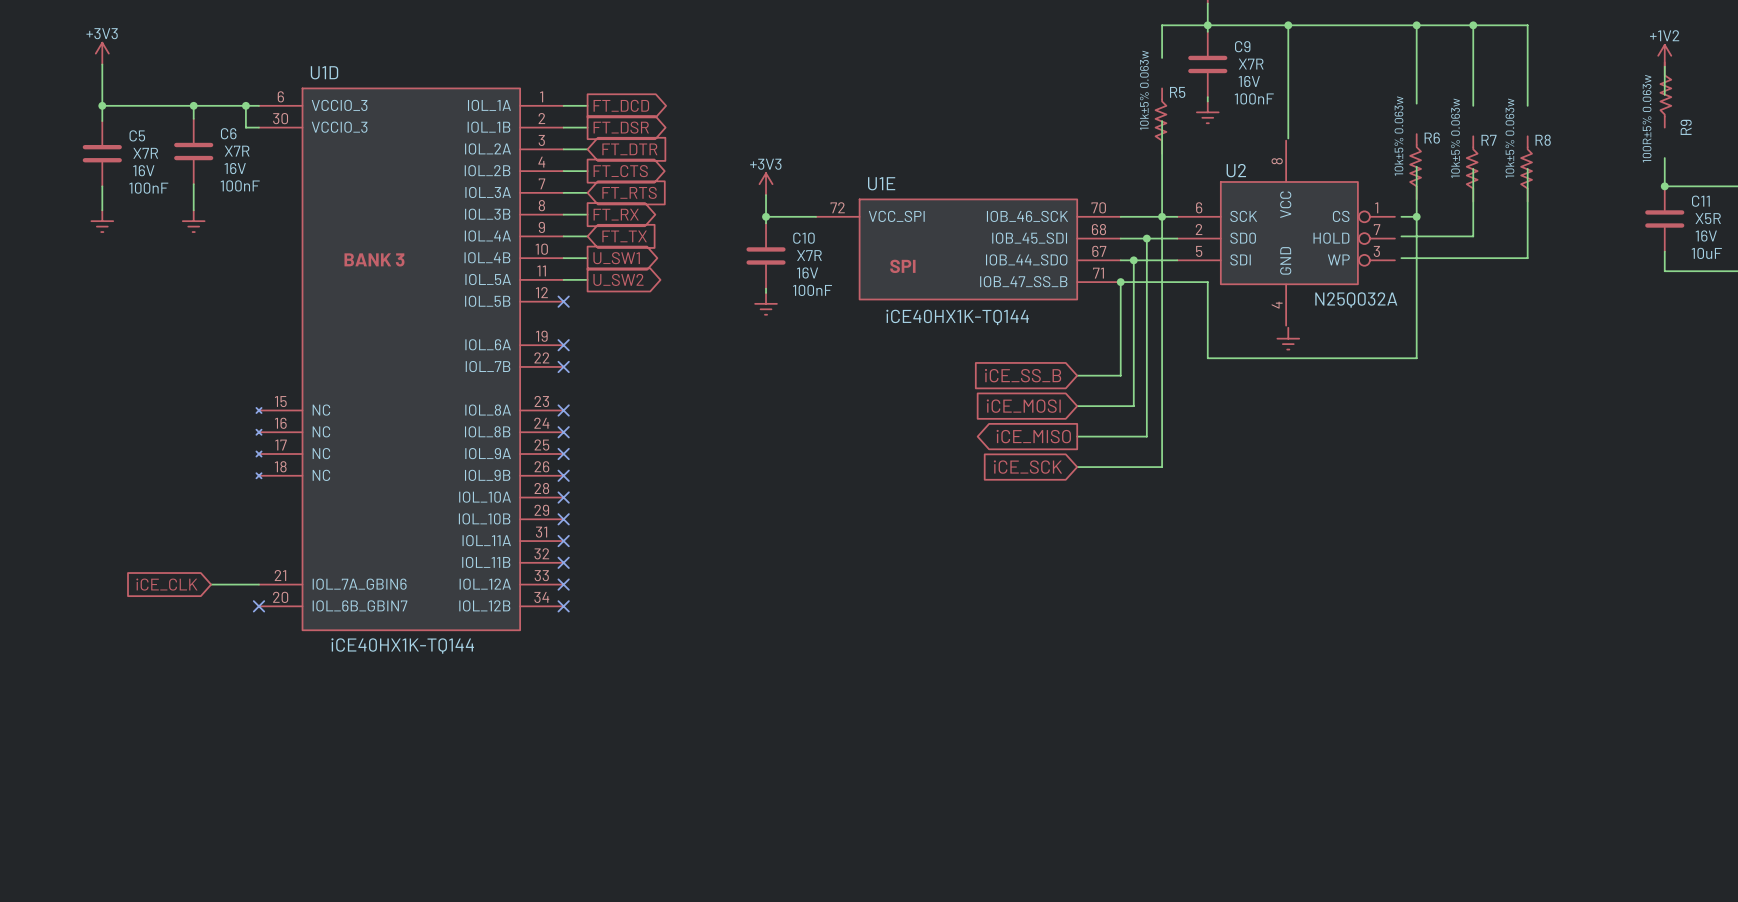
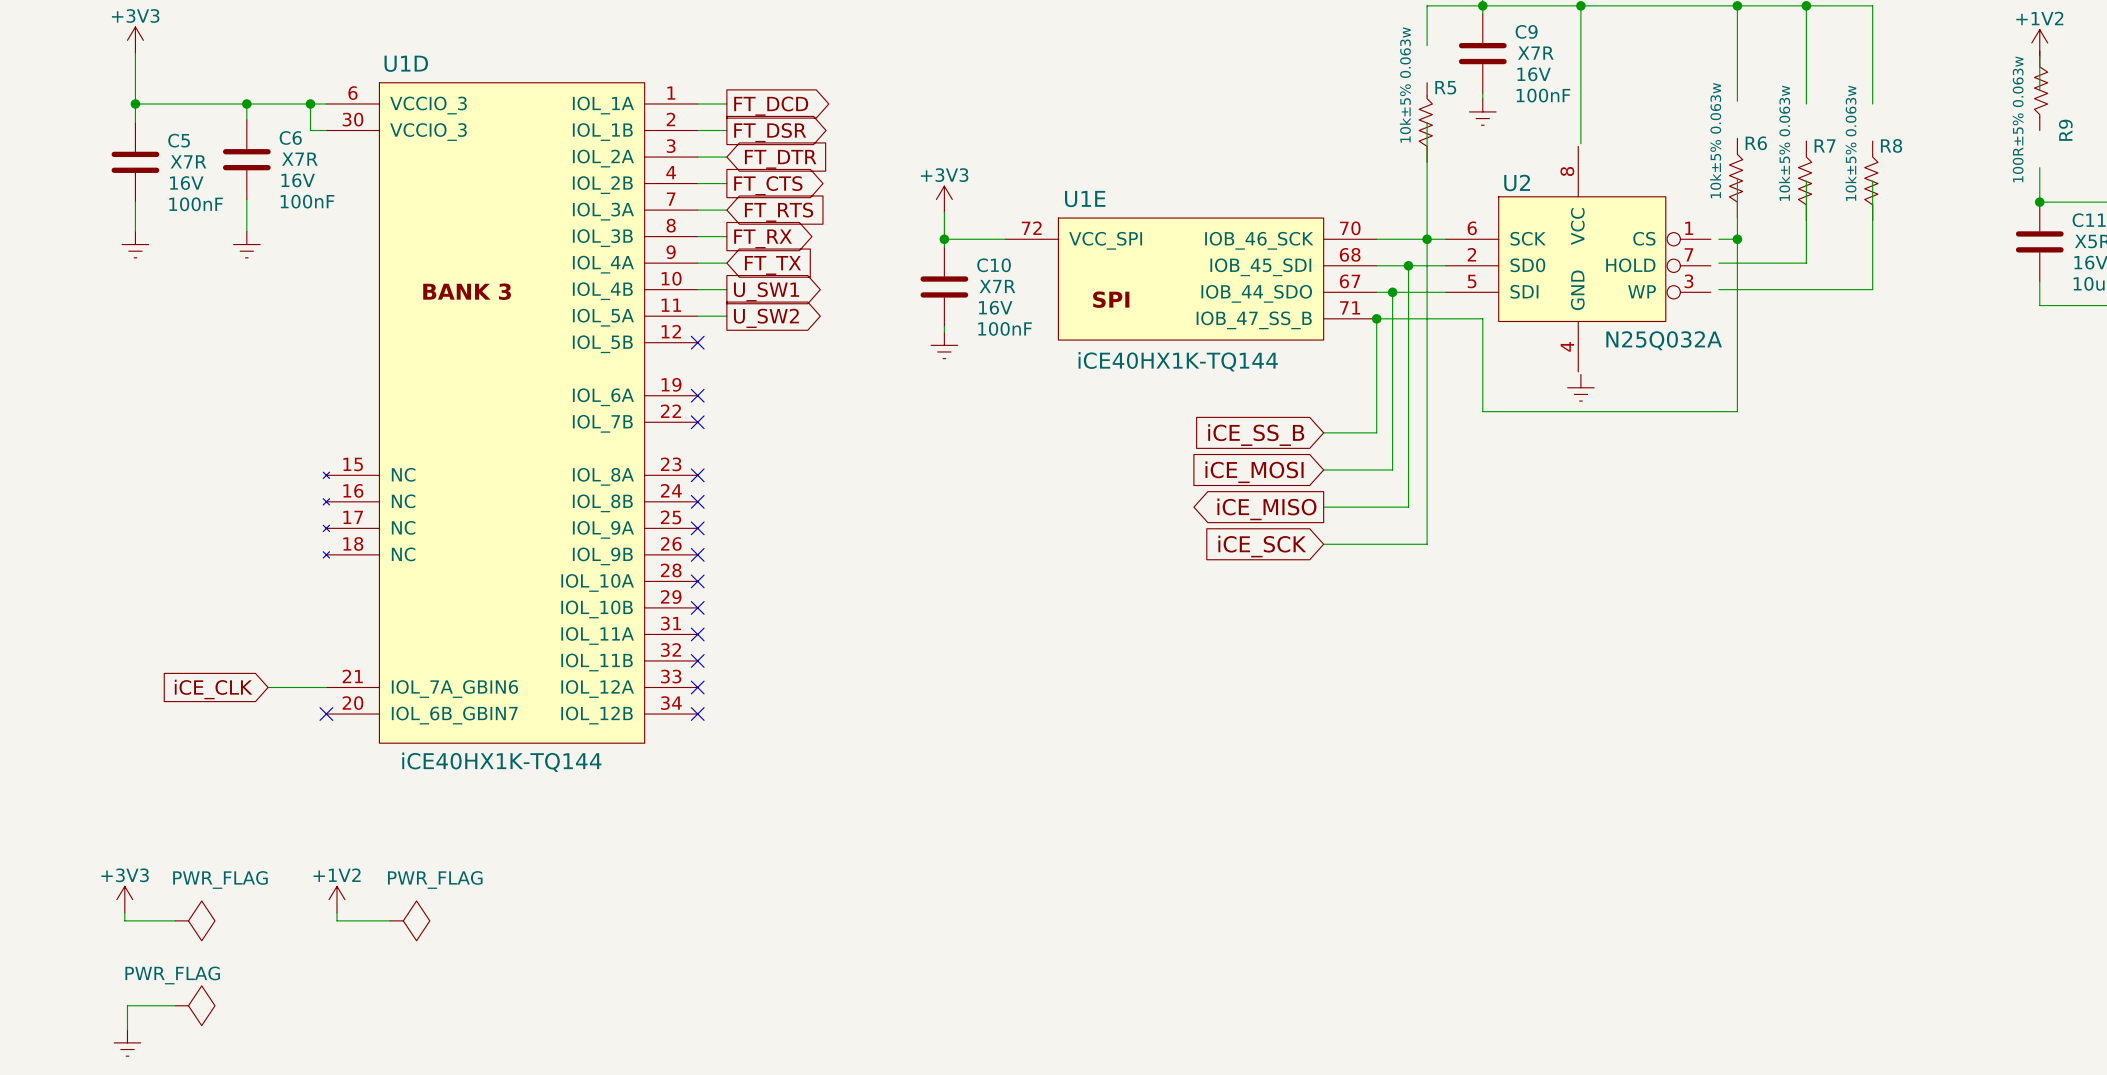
power symbol: none -> +3V3 (124, 899)
power symbol: none -> +1V2 (337, 899)
wire: none -> (124, 912) (124, 920) (175, 920)
wire: none -> (337, 912) (337, 920) (390, 920)
power symbol: none -> PWR_FLAG (195, 920)
power symbol: none -> PWR_FLAG (409, 920)
wire: none -> (175, 1005) (127, 1005) (127, 1029)
power symbol: none -> PWR_FLAG (195, 1005)
power symbol: none -> (127, 1042)

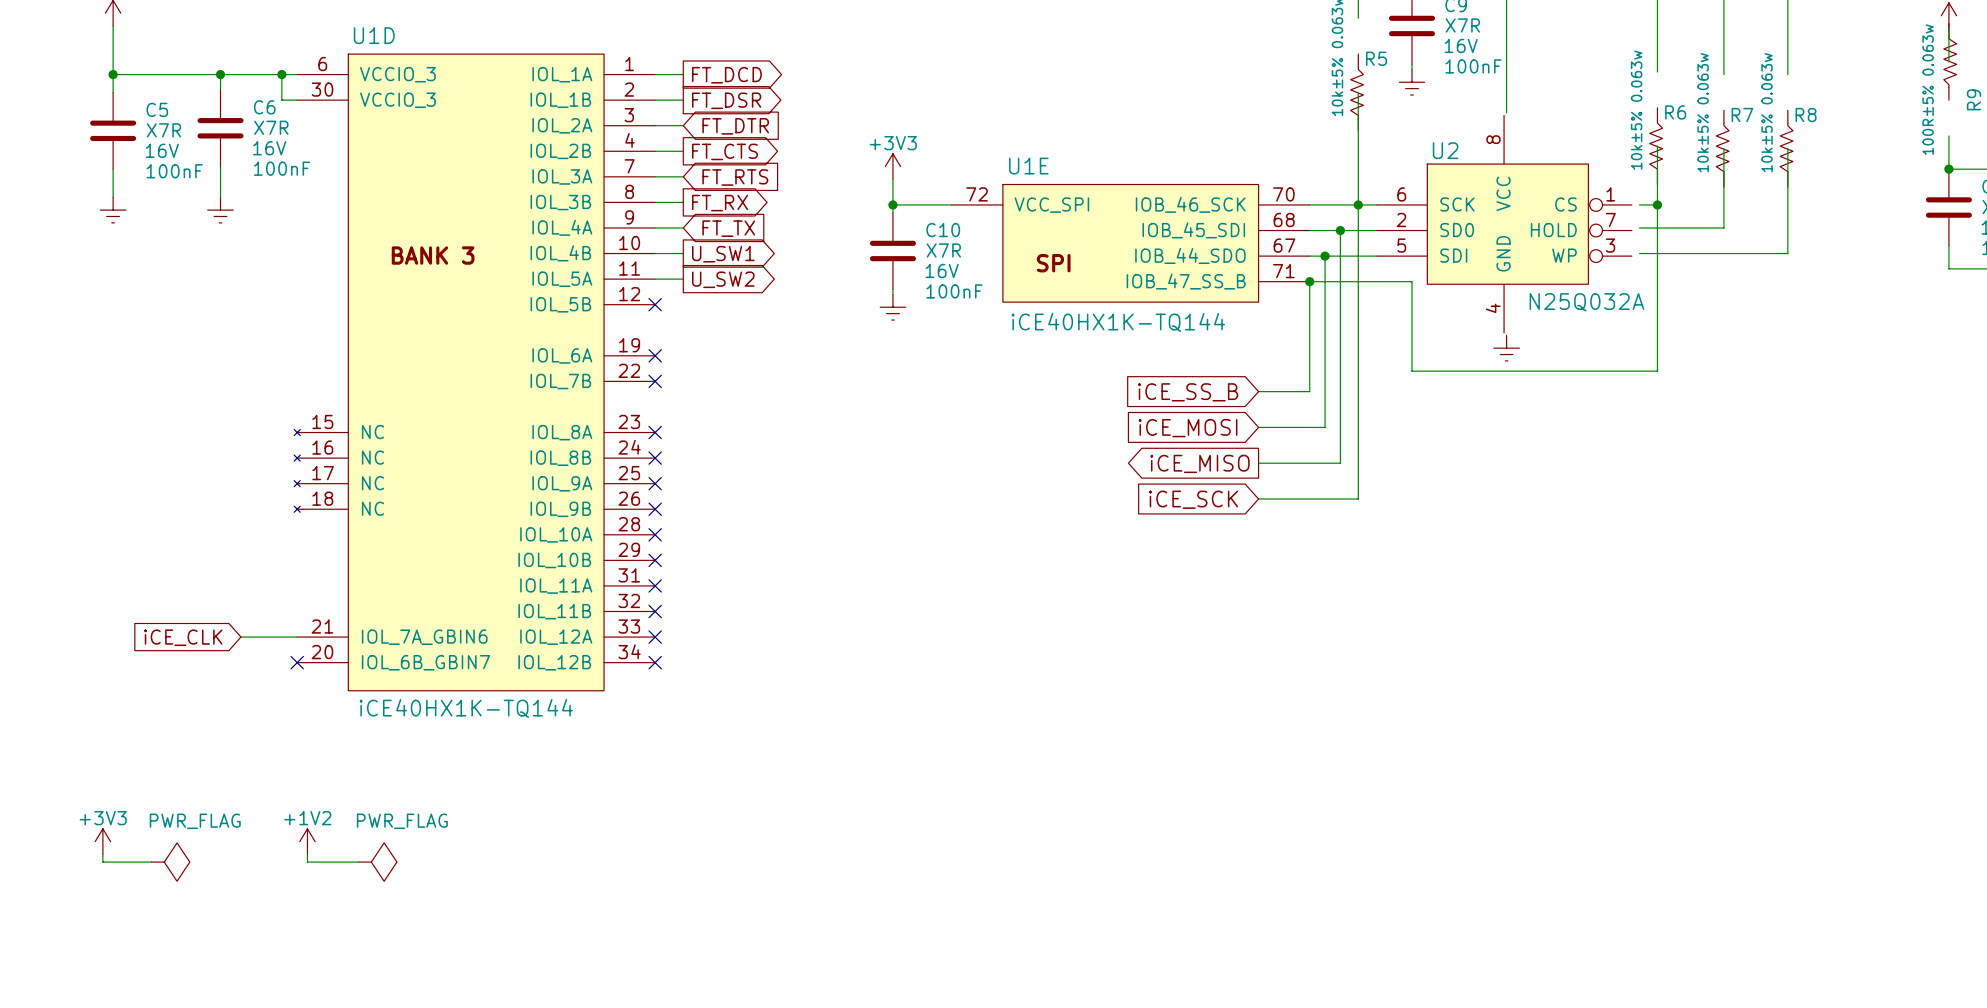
wire: (175, 1005) (127, 1005) (127, 1029) -> none
power symbol: PWR_FLAG (195, 1005) -> none
power symbol: (127, 1042) -> none

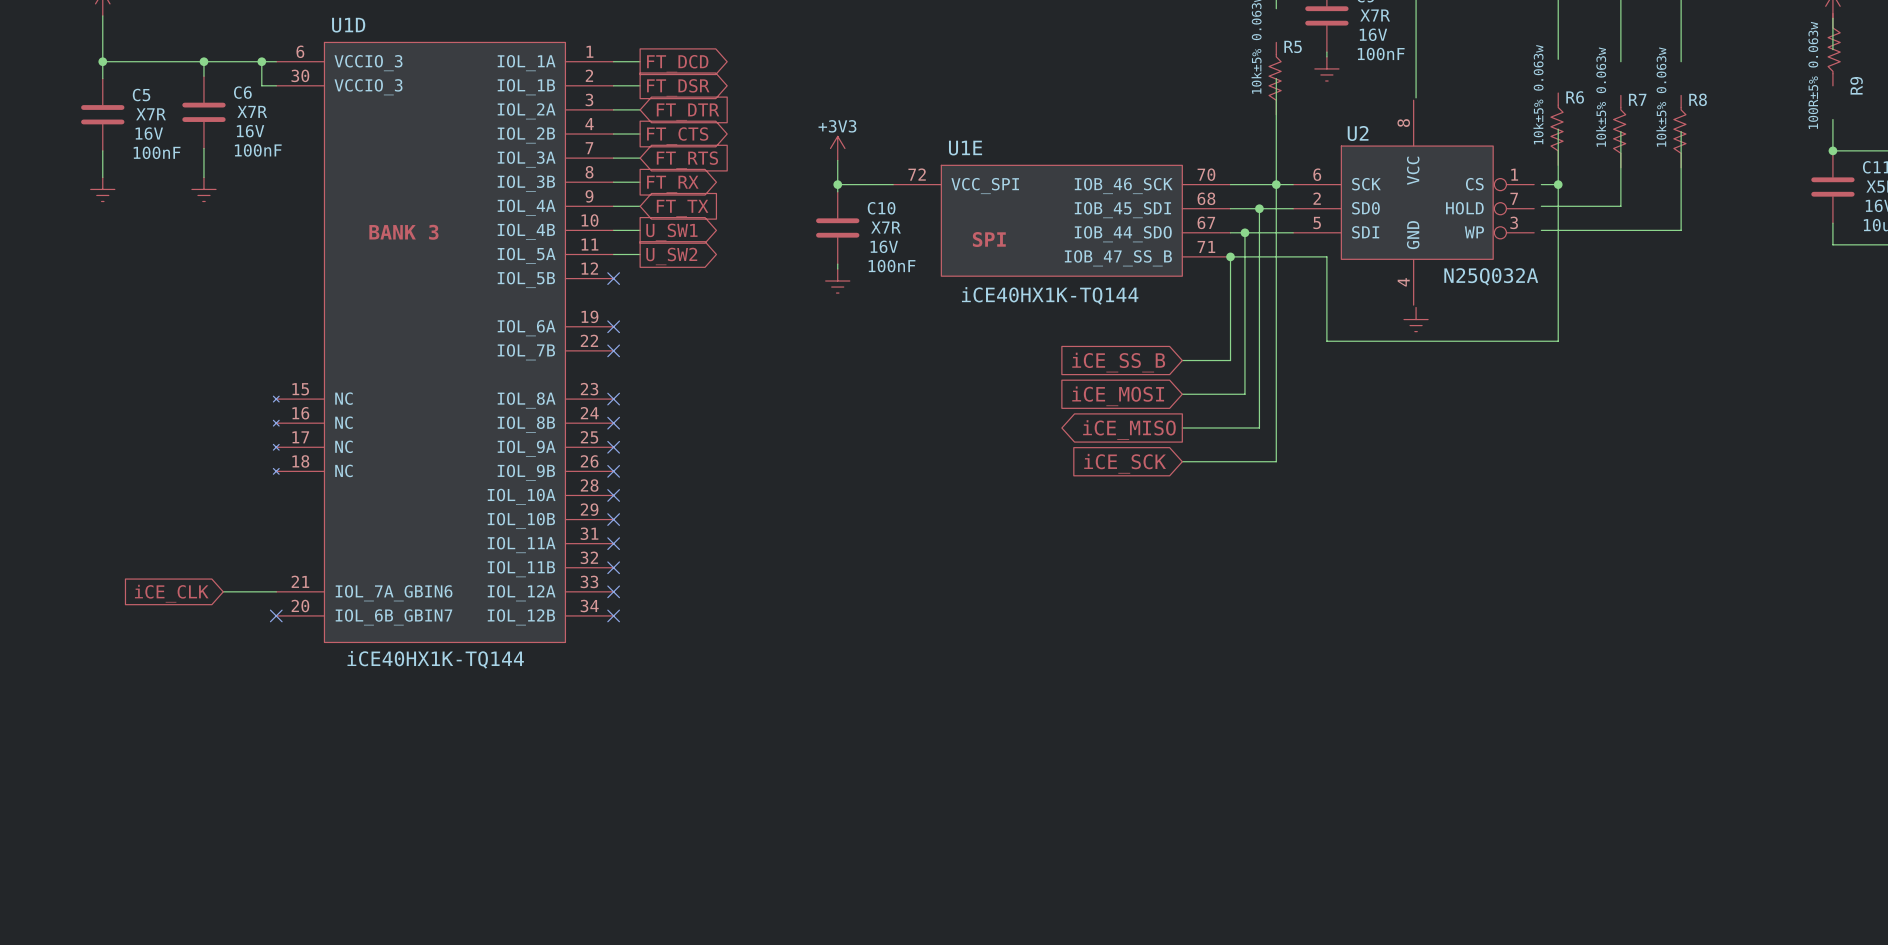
power symbol: +3V3 (102, 841) -> none
power symbol: +1V2 (307, 841) -> none
wire: (102, 854) (102, 862) (151, 862) -> none
wire: (307, 854) (307, 862) (358, 862) -> none
power symbol: PWR_FLAG (170, 862) -> none
power symbol: PWR_FLAG (377, 862) -> none

